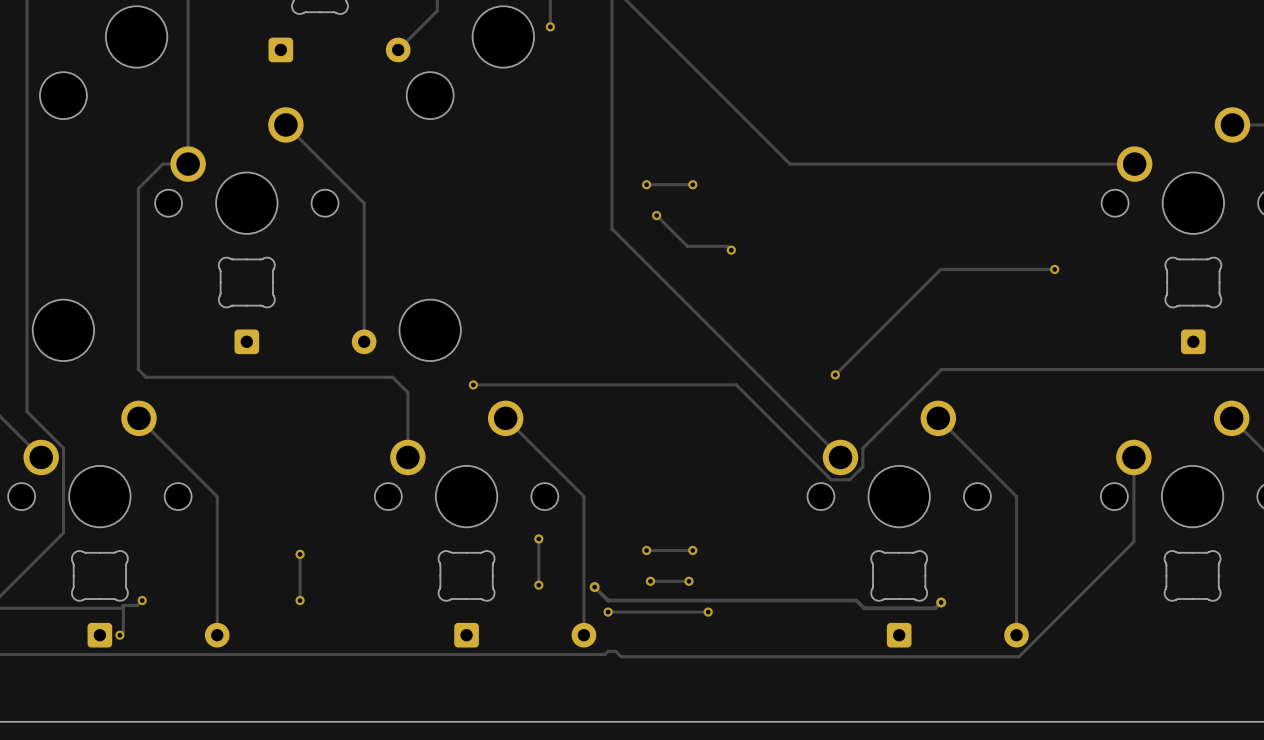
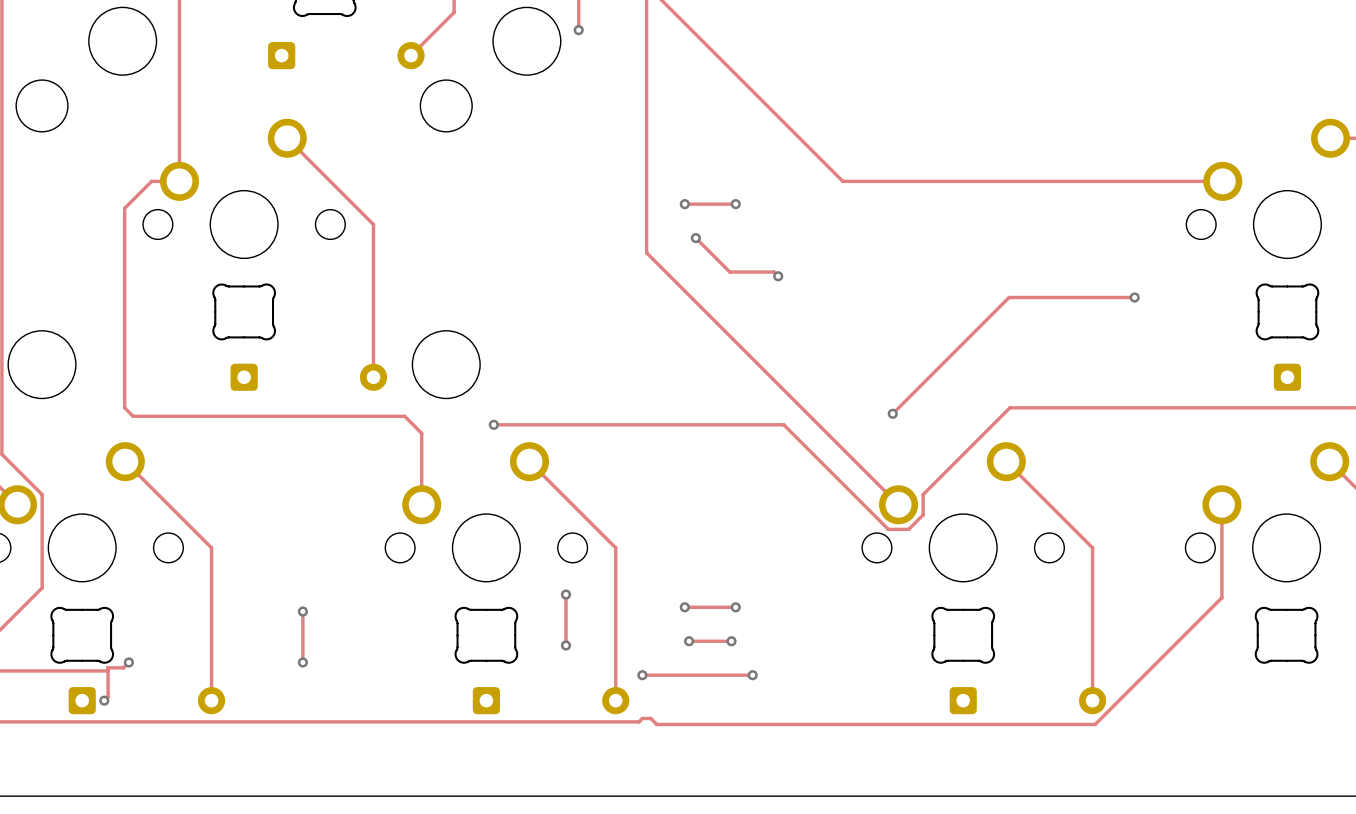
track: (594, 587) (608, 600) (856, 600) (864, 608) (935, 608) (941, 602) -> none
via: (594, 587) -> none
via: (941, 602) -> none

